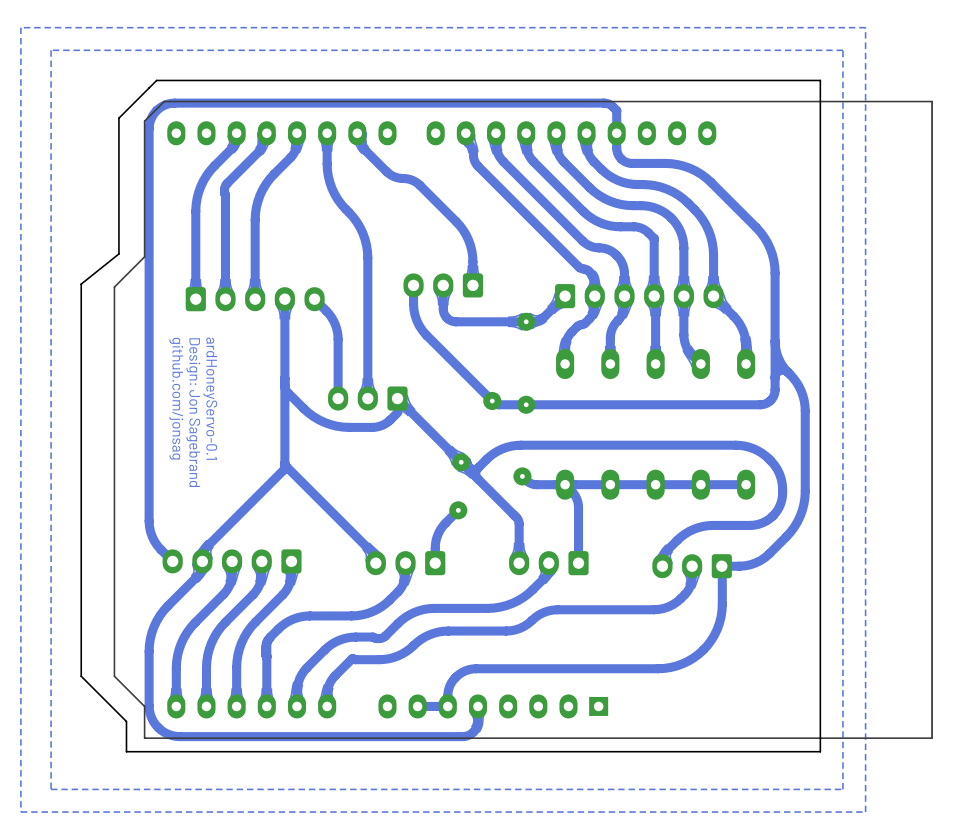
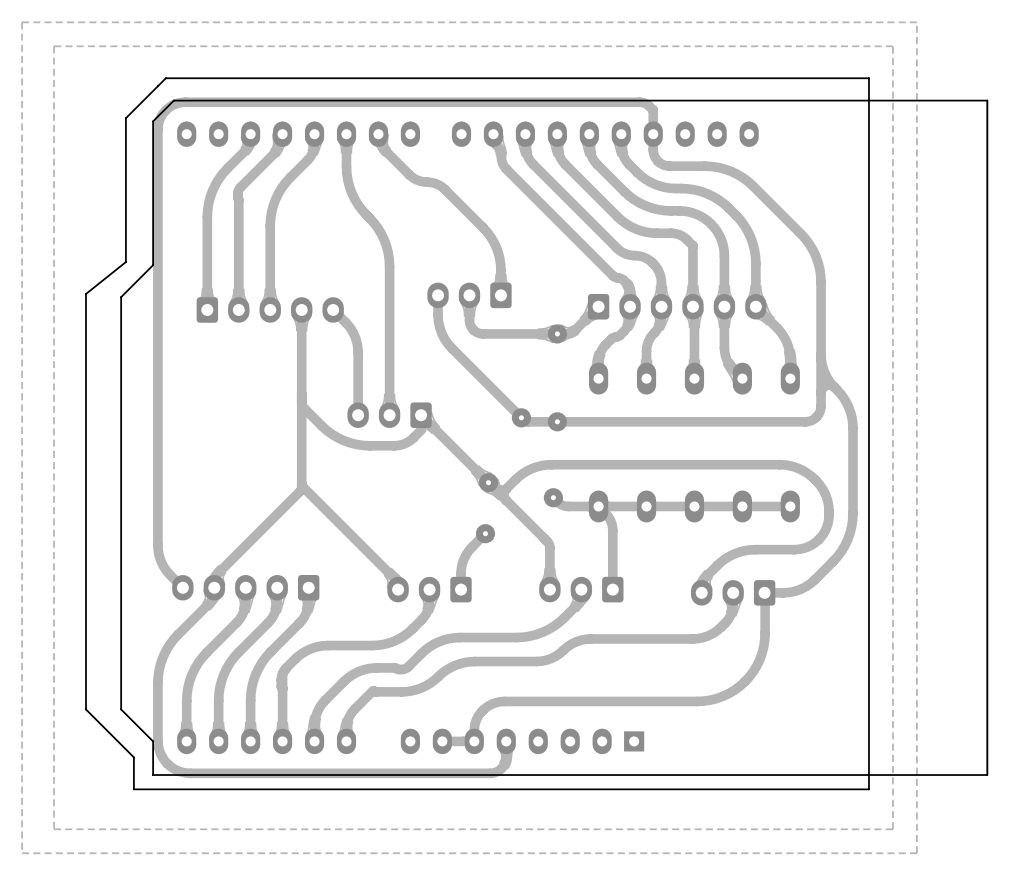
text: github.com/jonsag (176, 398) -> none
text: ardHoneyServo-0.1 (210, 398) -> none
text: Design: Jon Sagebrand (193, 412) -> none

